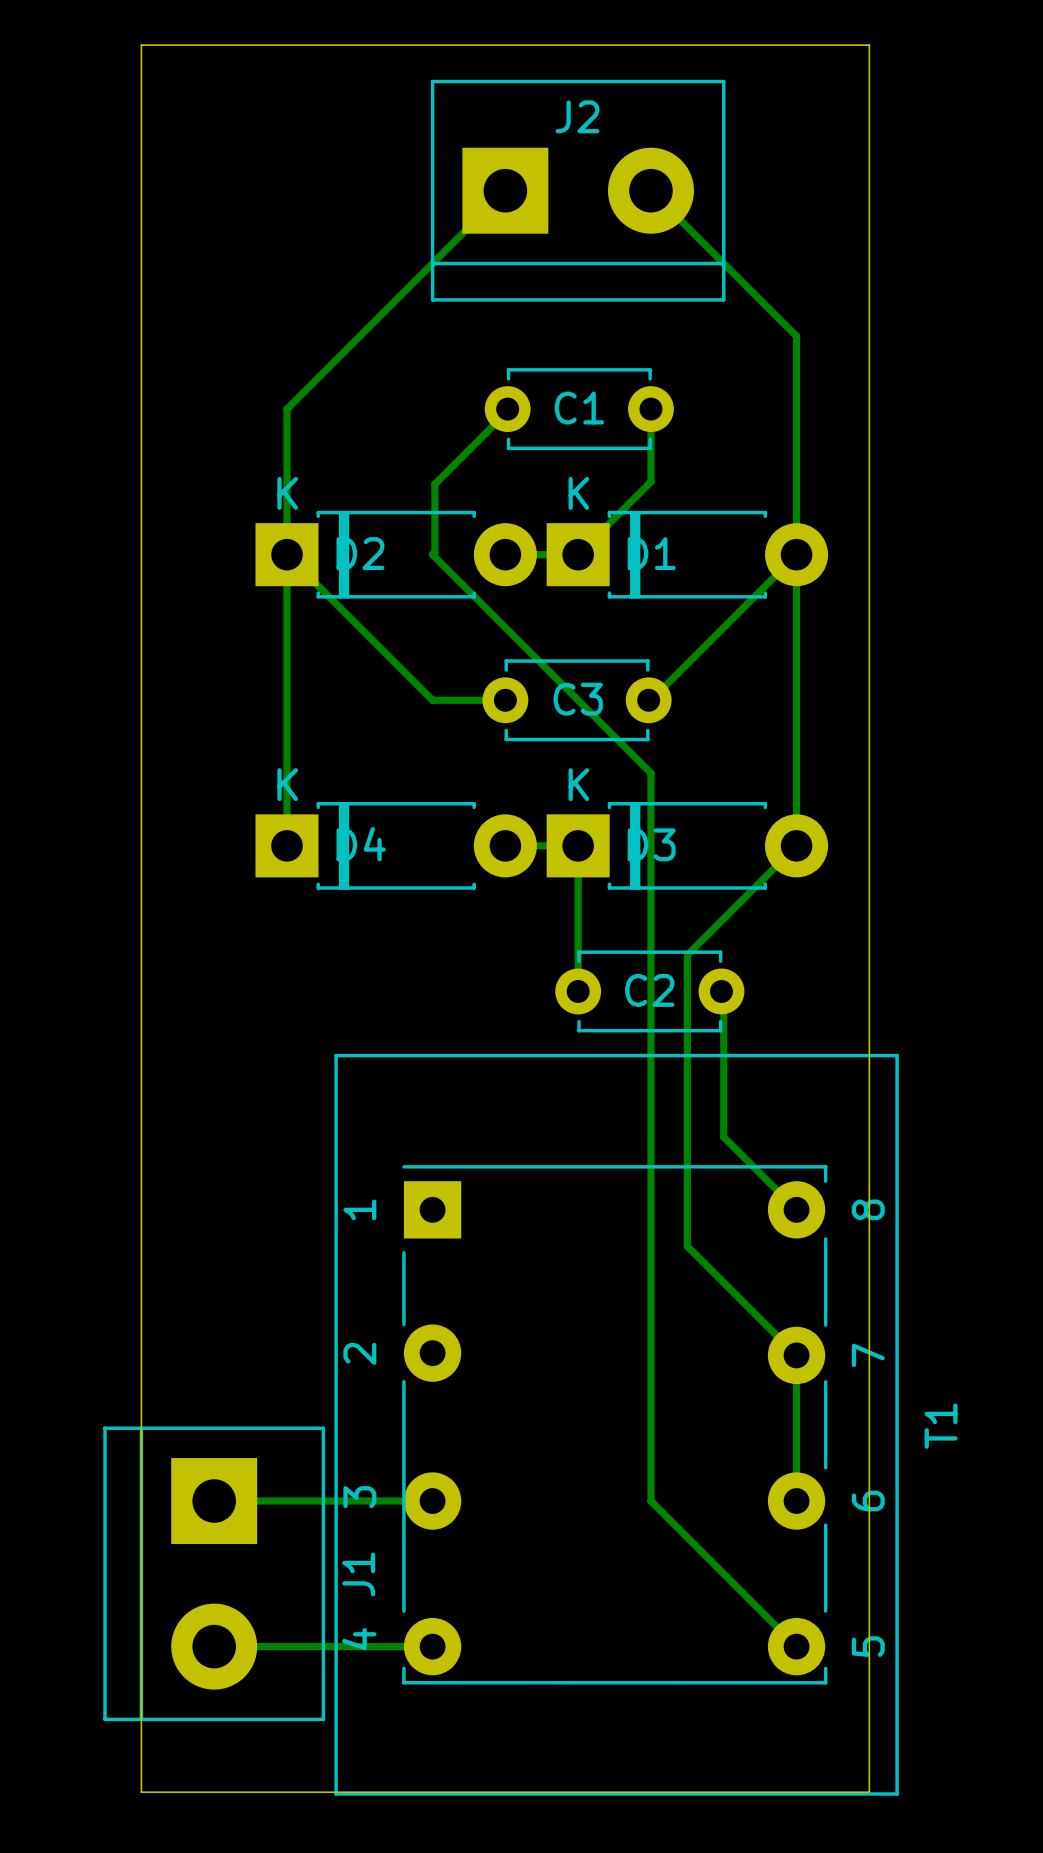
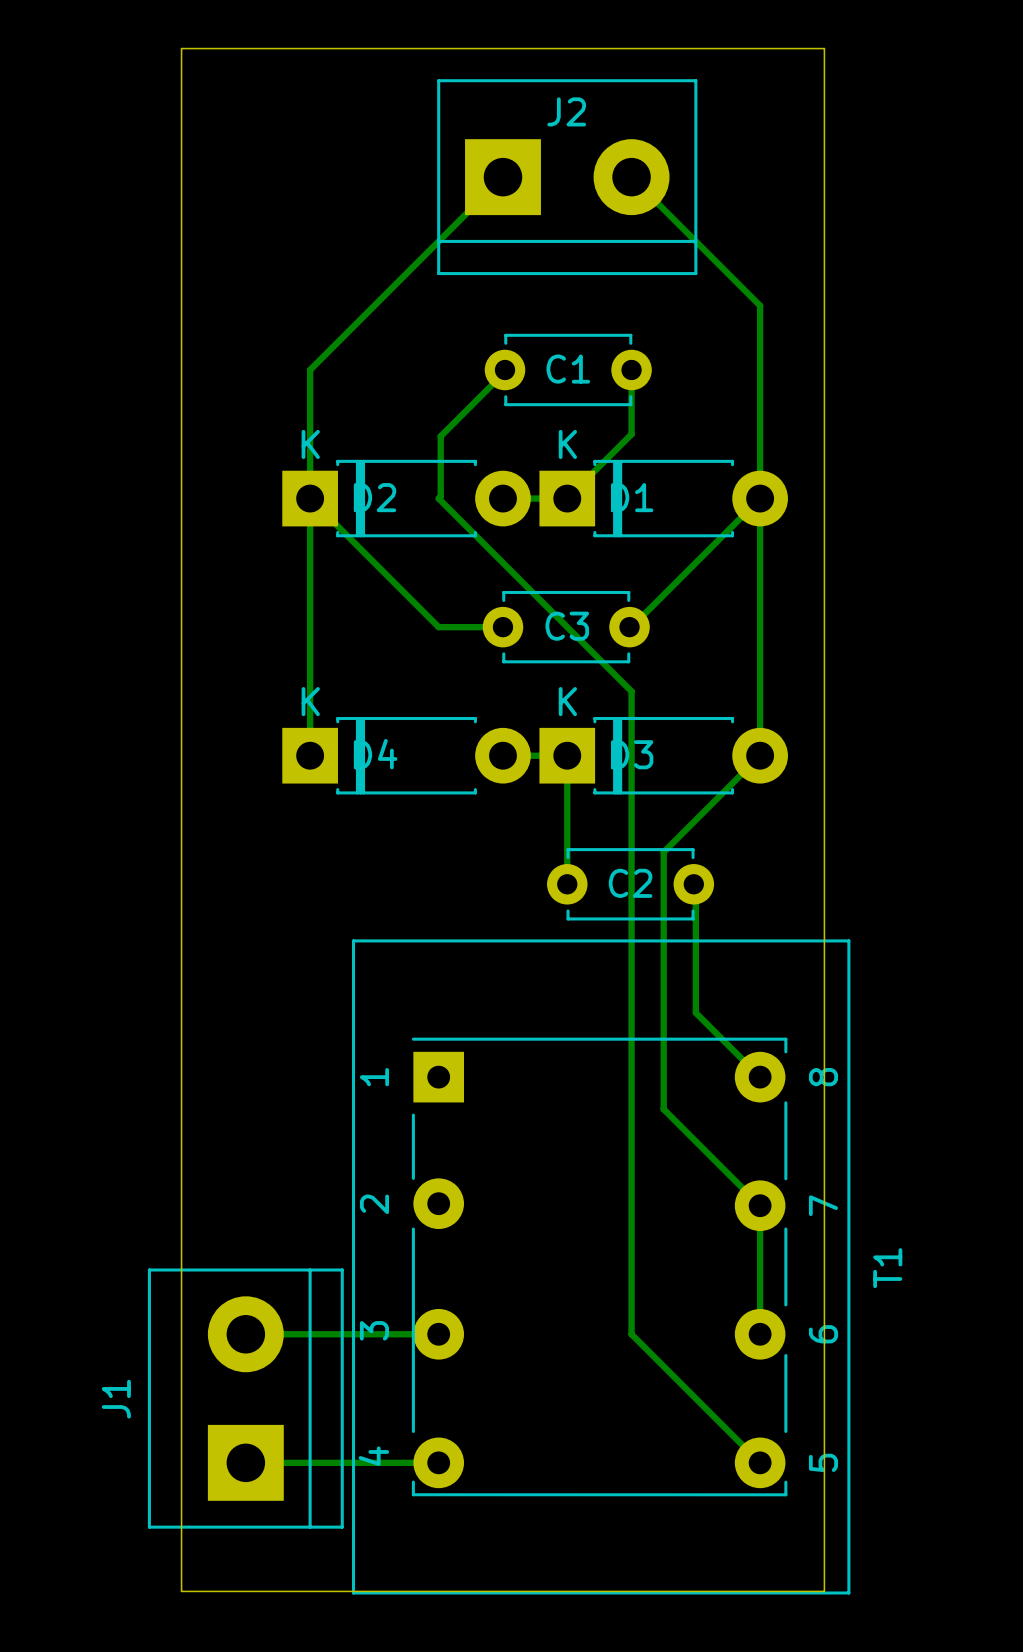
J1 rotation: 0° (214, 1573) -> 180° (245, 1398)

